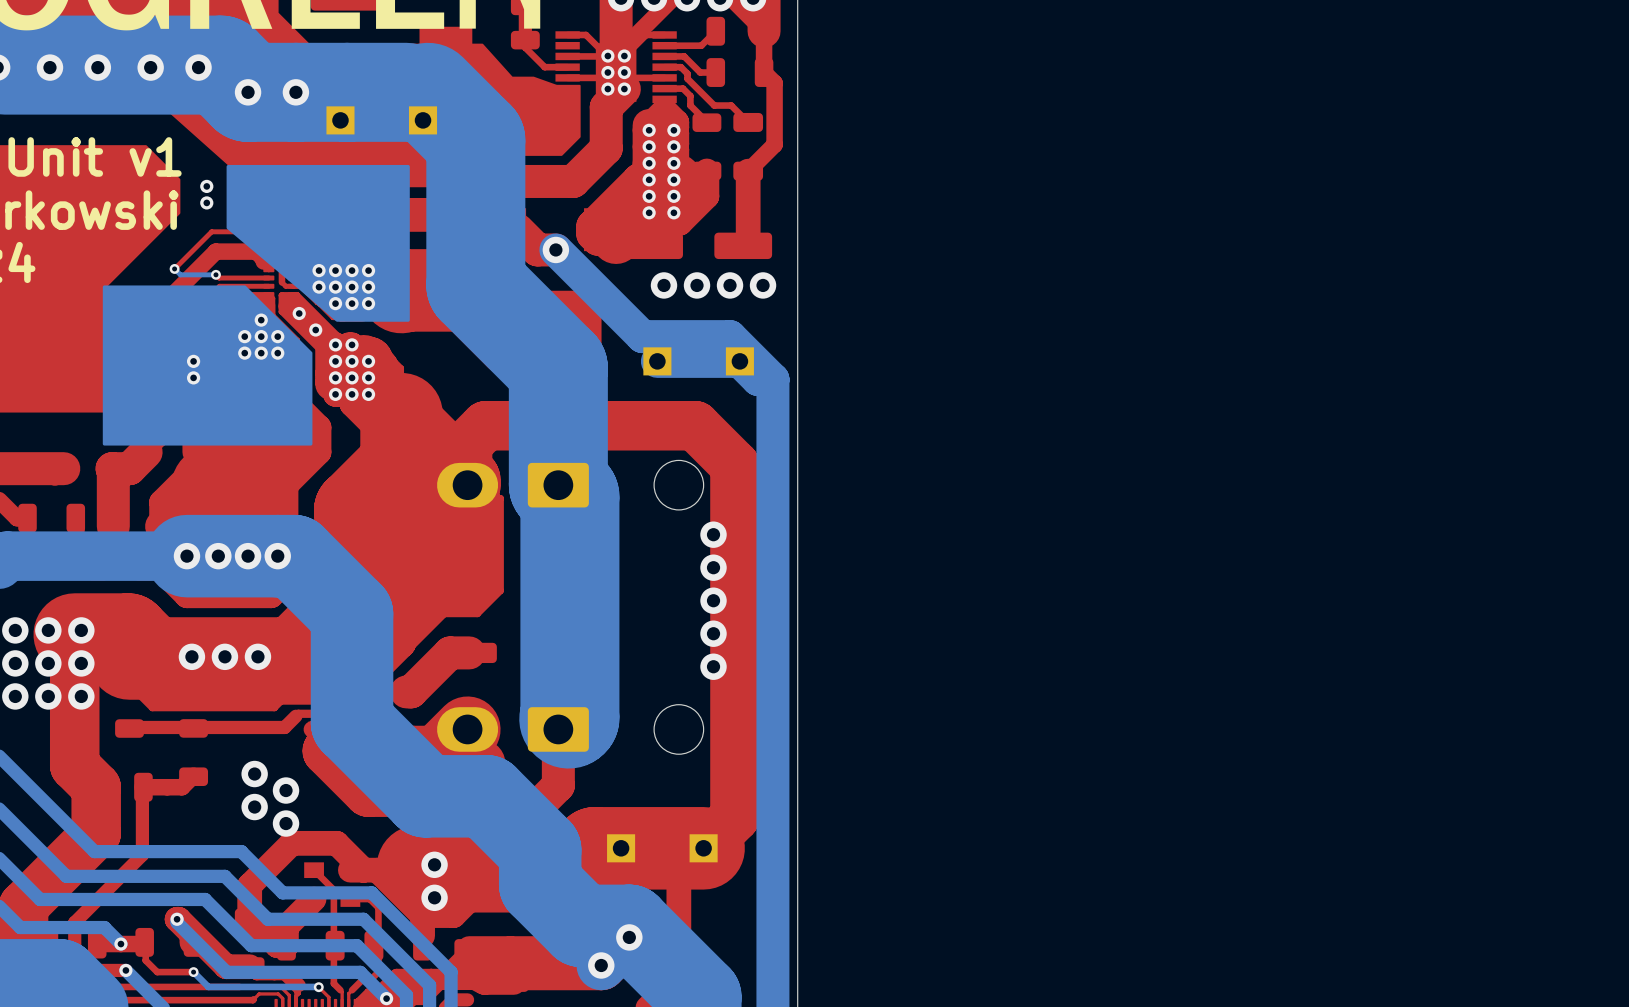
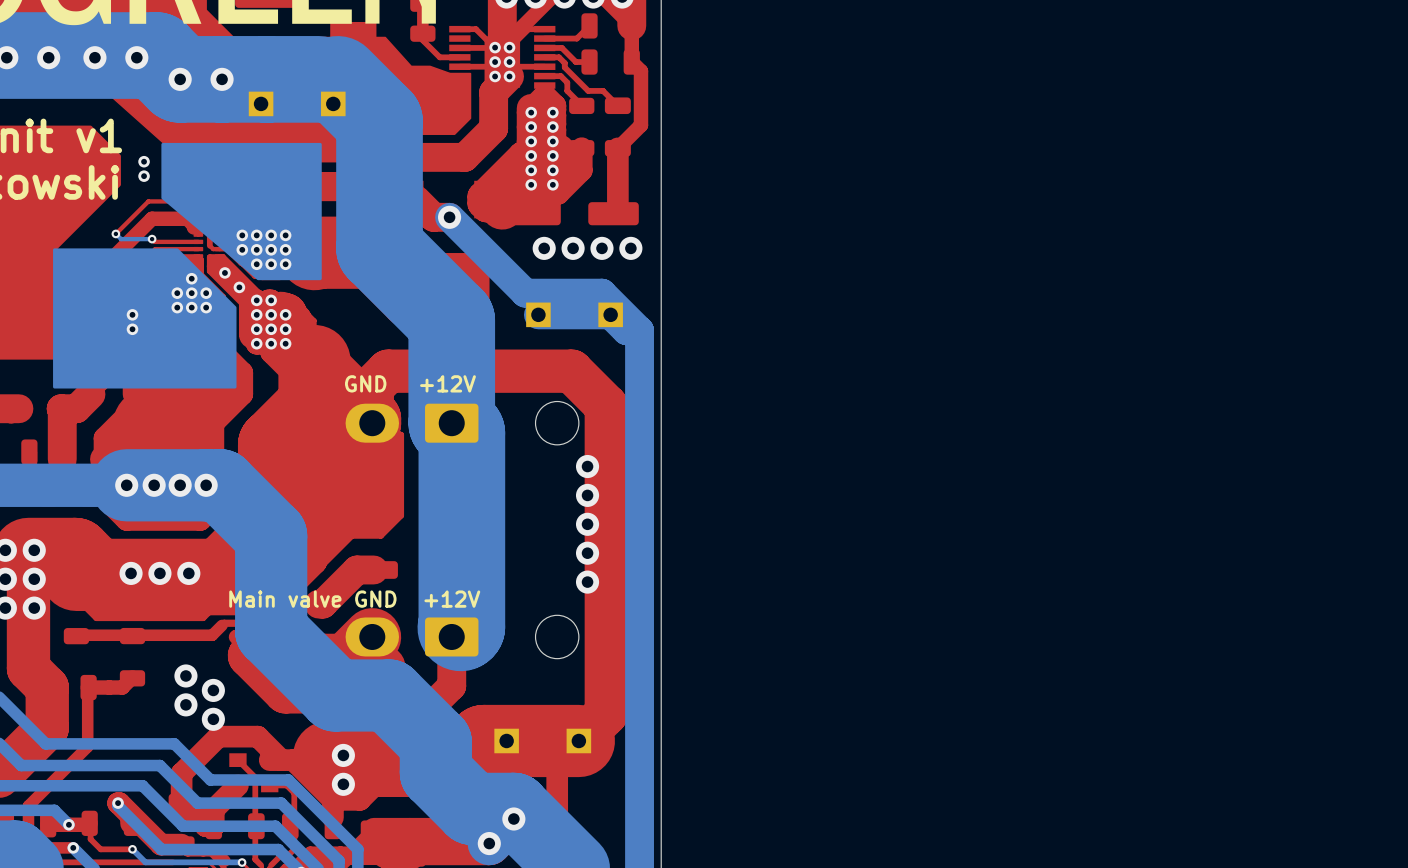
text: none -> GND (365, 383)
text: none -> +12V (447, 383)
text: none -> Main valve GND (312, 599)
text: none -> +12V (452, 599)

